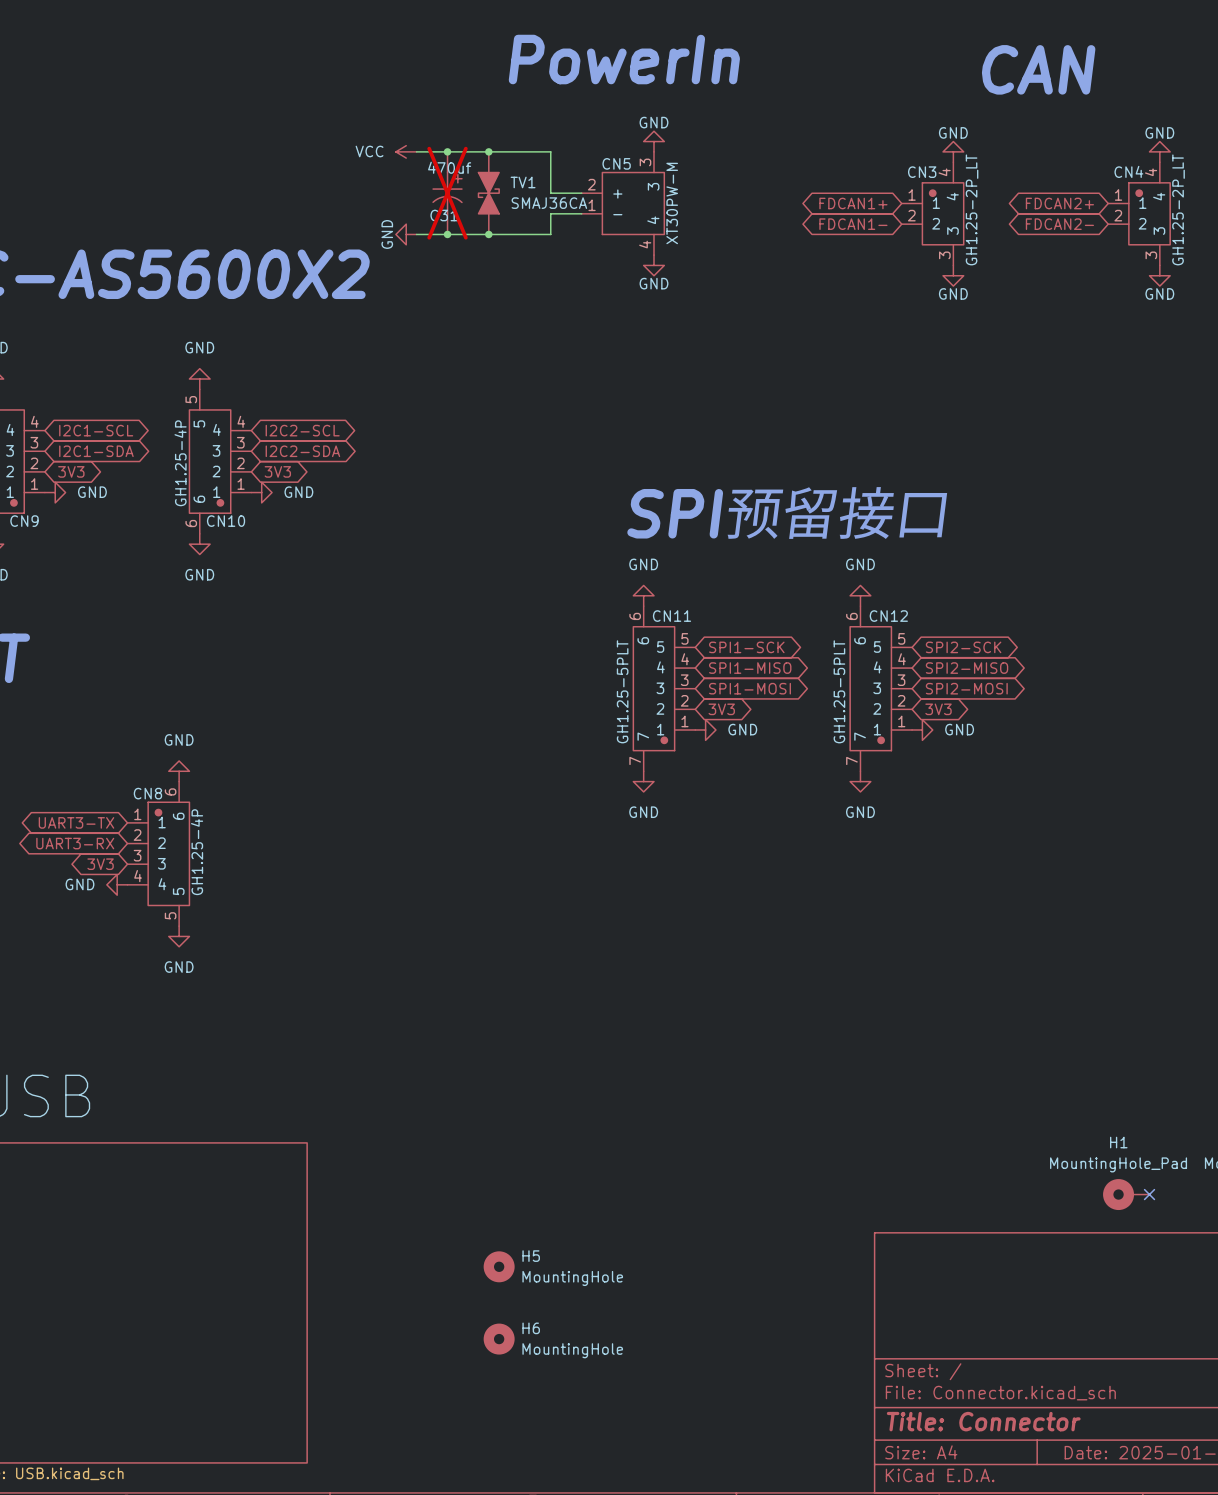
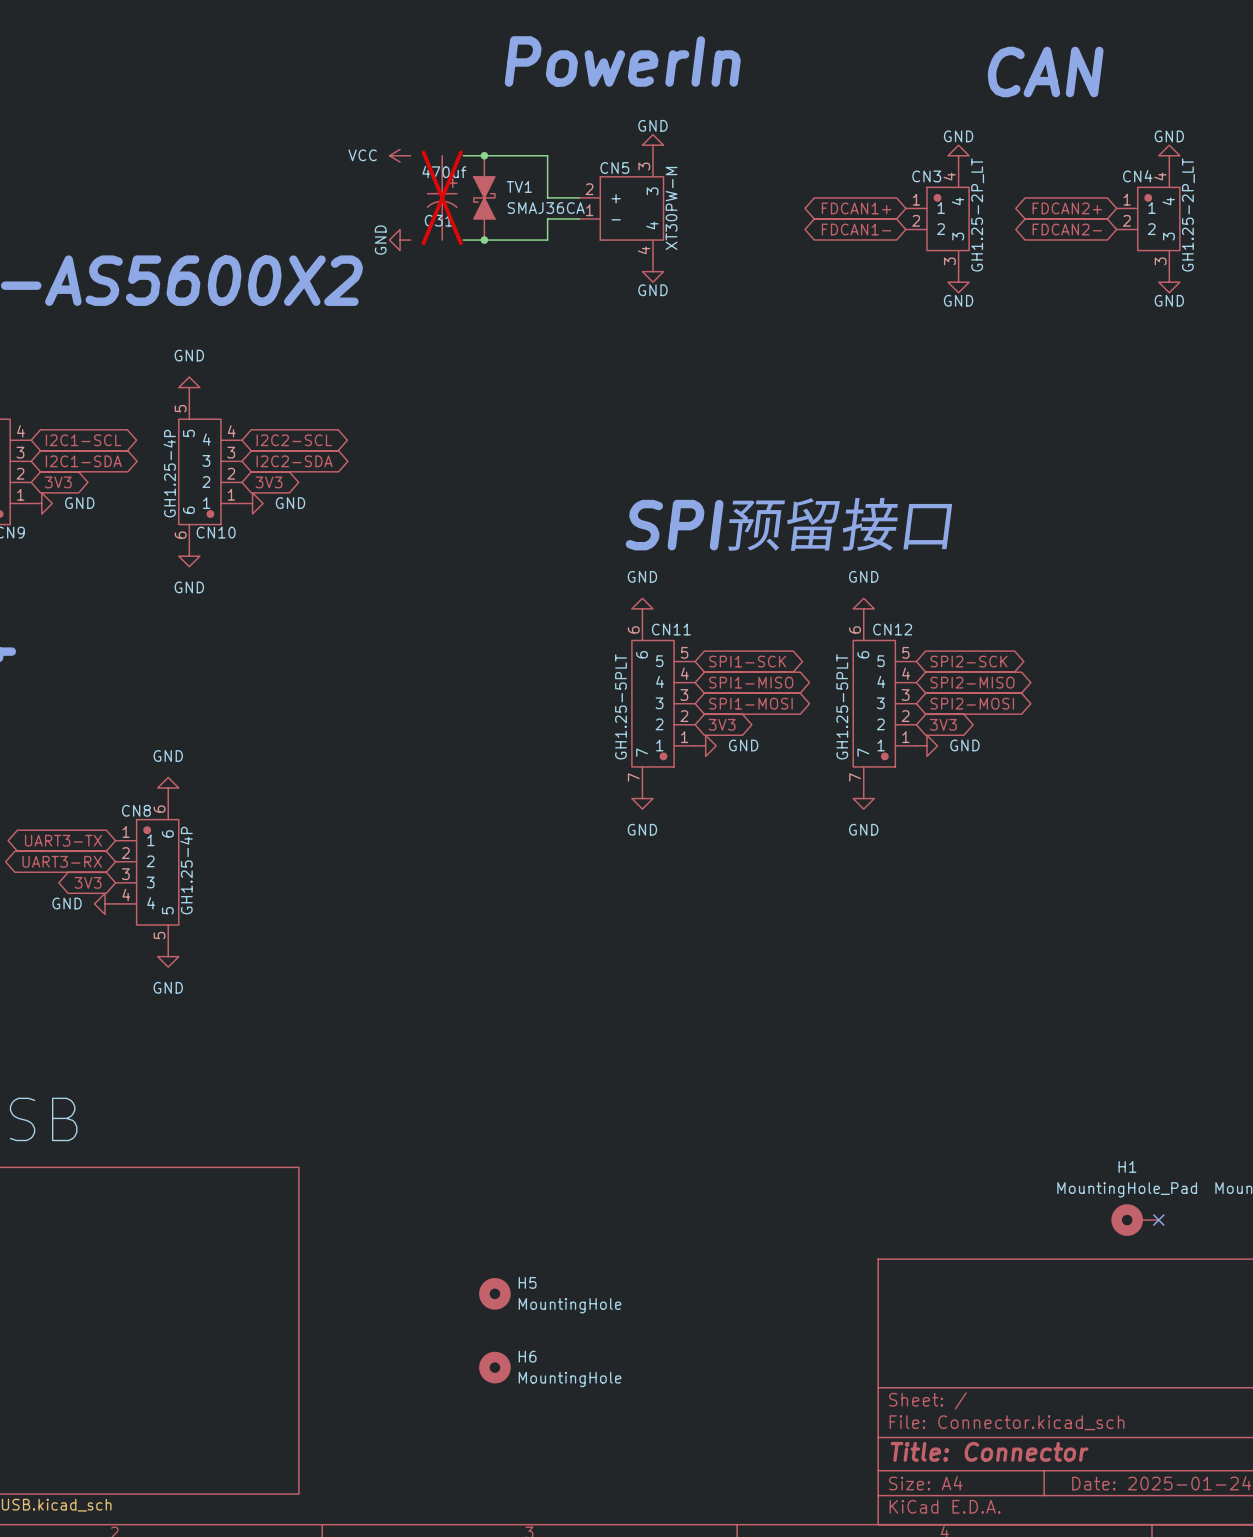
wire: (416, 151) (468, 151) -> none
junction: (447, 151) -> none
wire: (416, 234) (468, 234) -> none
junction: (447, 234) -> none

